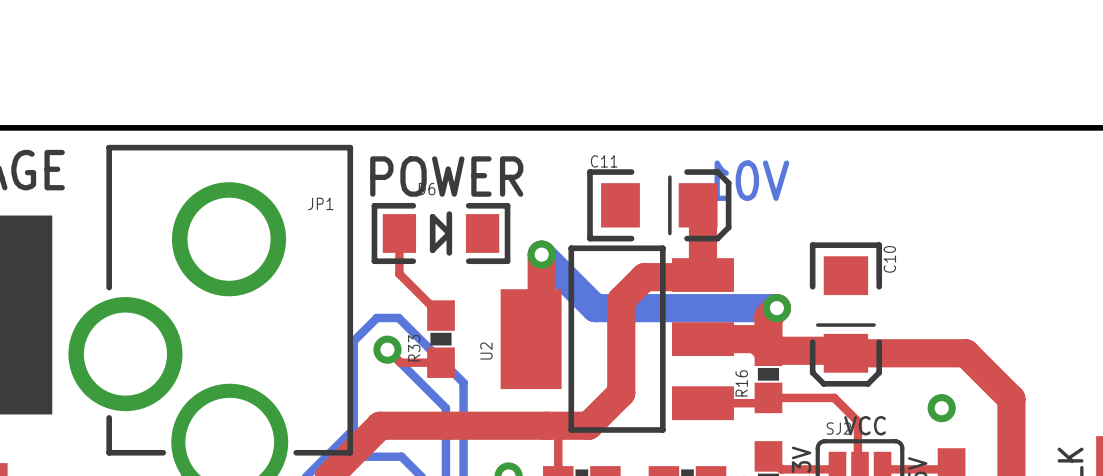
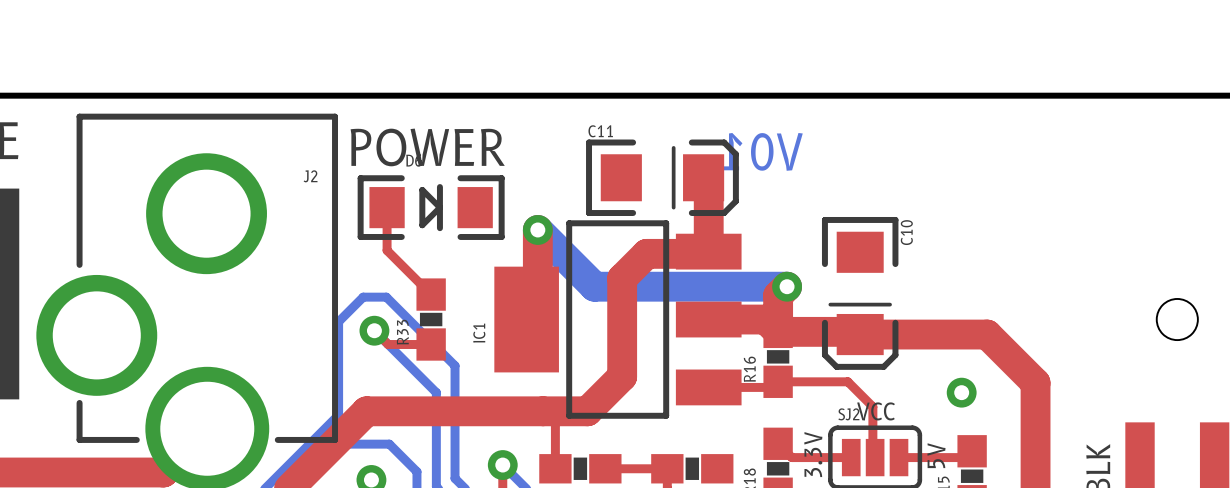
JP1 name: JP1 (320, 203) -> J2 (310, 176)
U2 name: U2 (486, 351) -> IC1 (479, 333)

